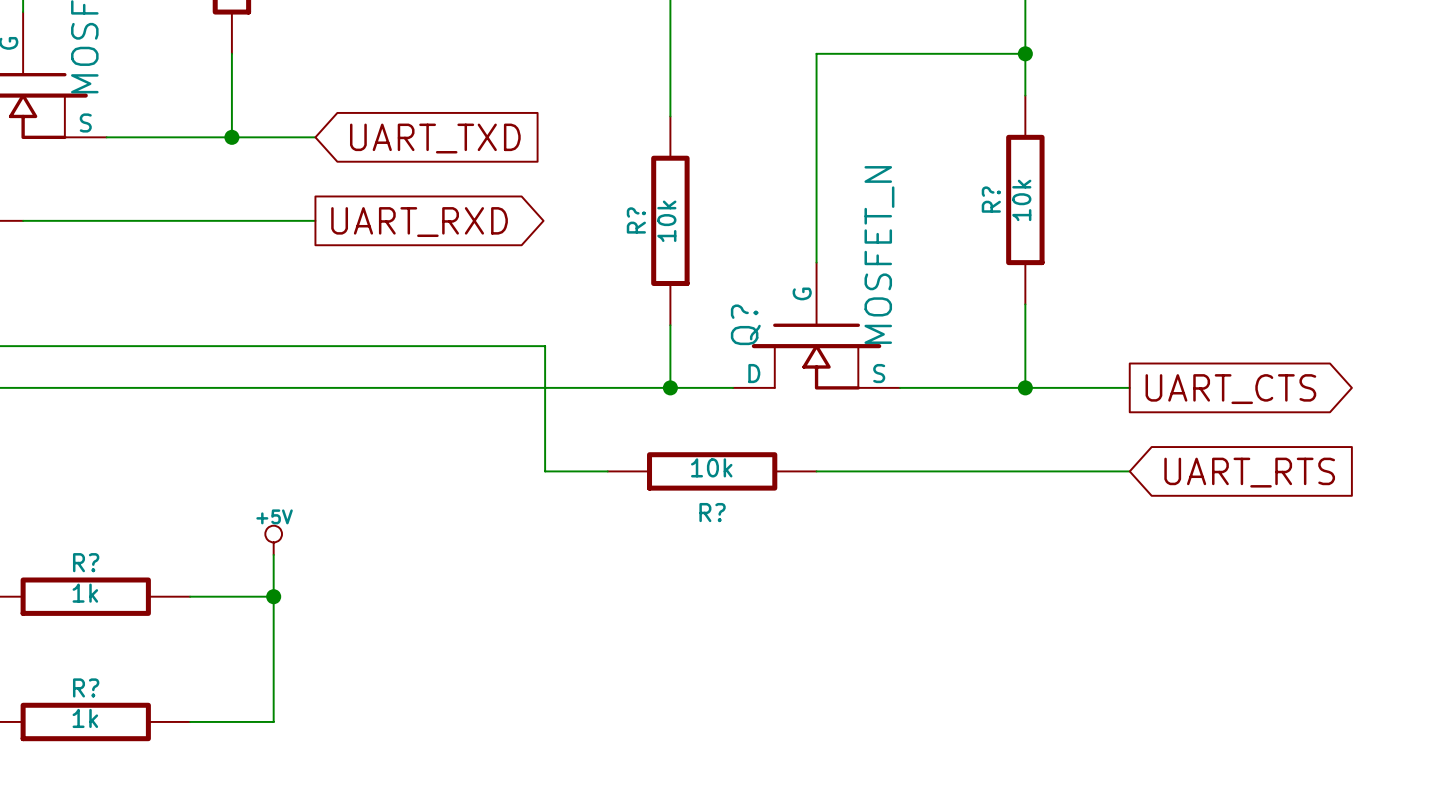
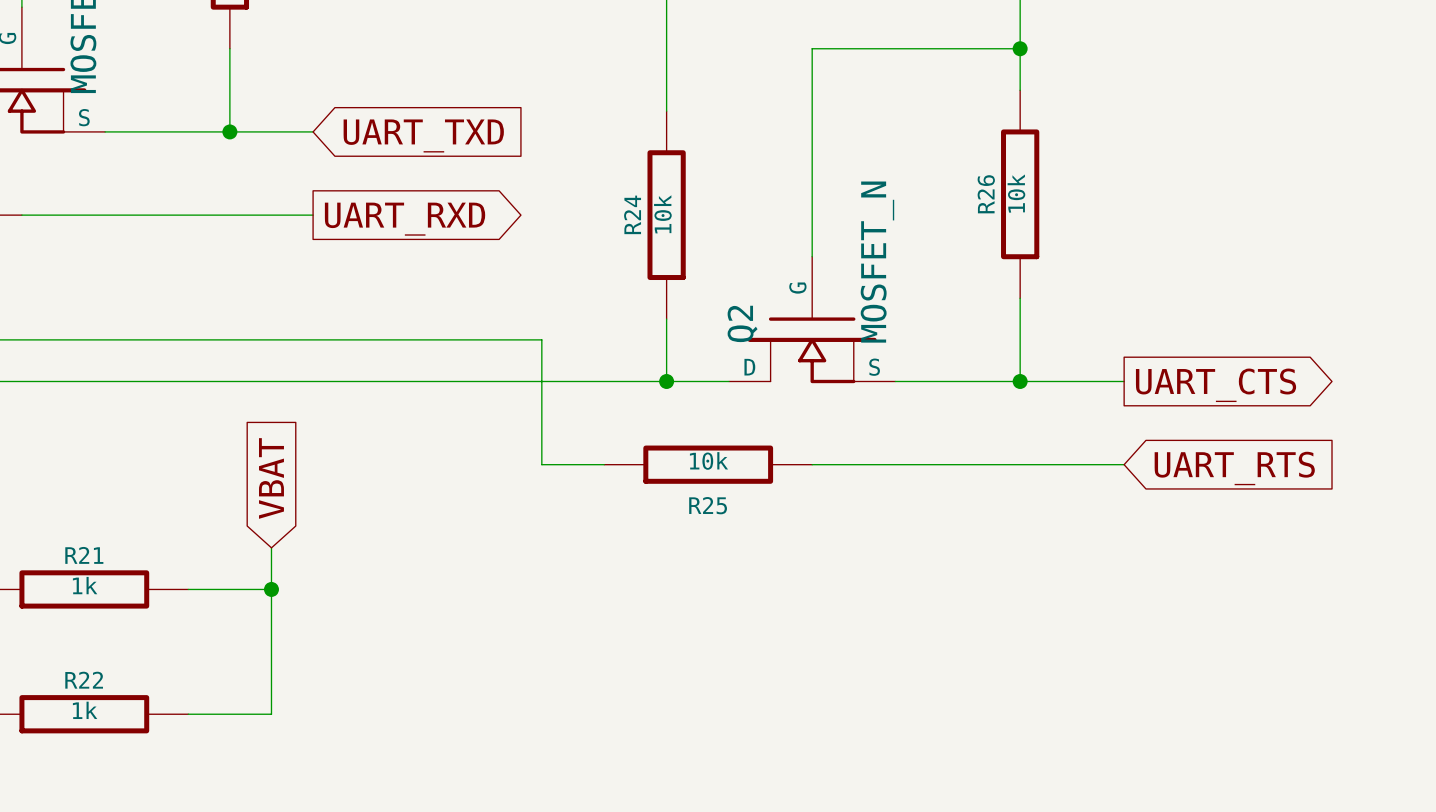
R? name: R? (991, 199) -> R26 (986, 194)
R? name: R? (636, 220) -> R24 (632, 214)
Q? name: Q? (745, 324) -> Q2 (742, 323)
global label: none -> VBAT (271, 478)
R? name: R? (712, 512) -> R25 (708, 505)
power symbol: +5V (273, 540) -> none
R? name: R? (86, 562) -> R21 (84, 555)
R? name: R? (86, 687) -> R22 (84, 680)

